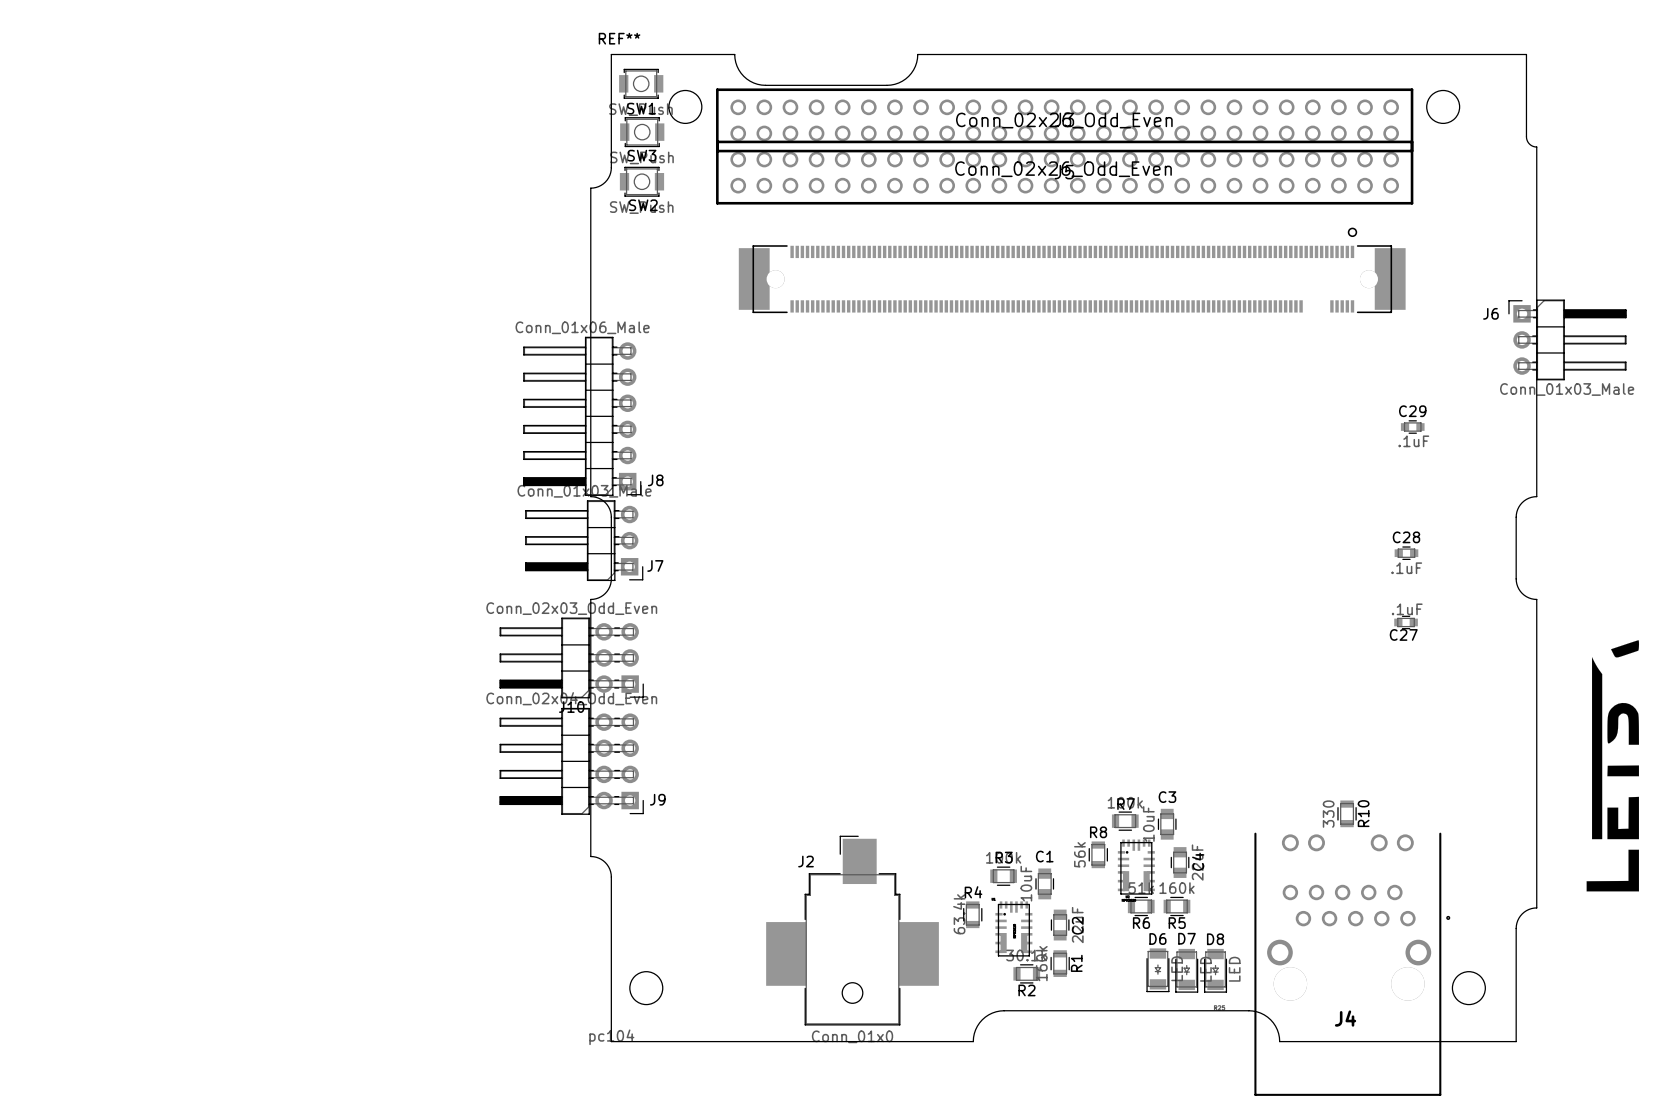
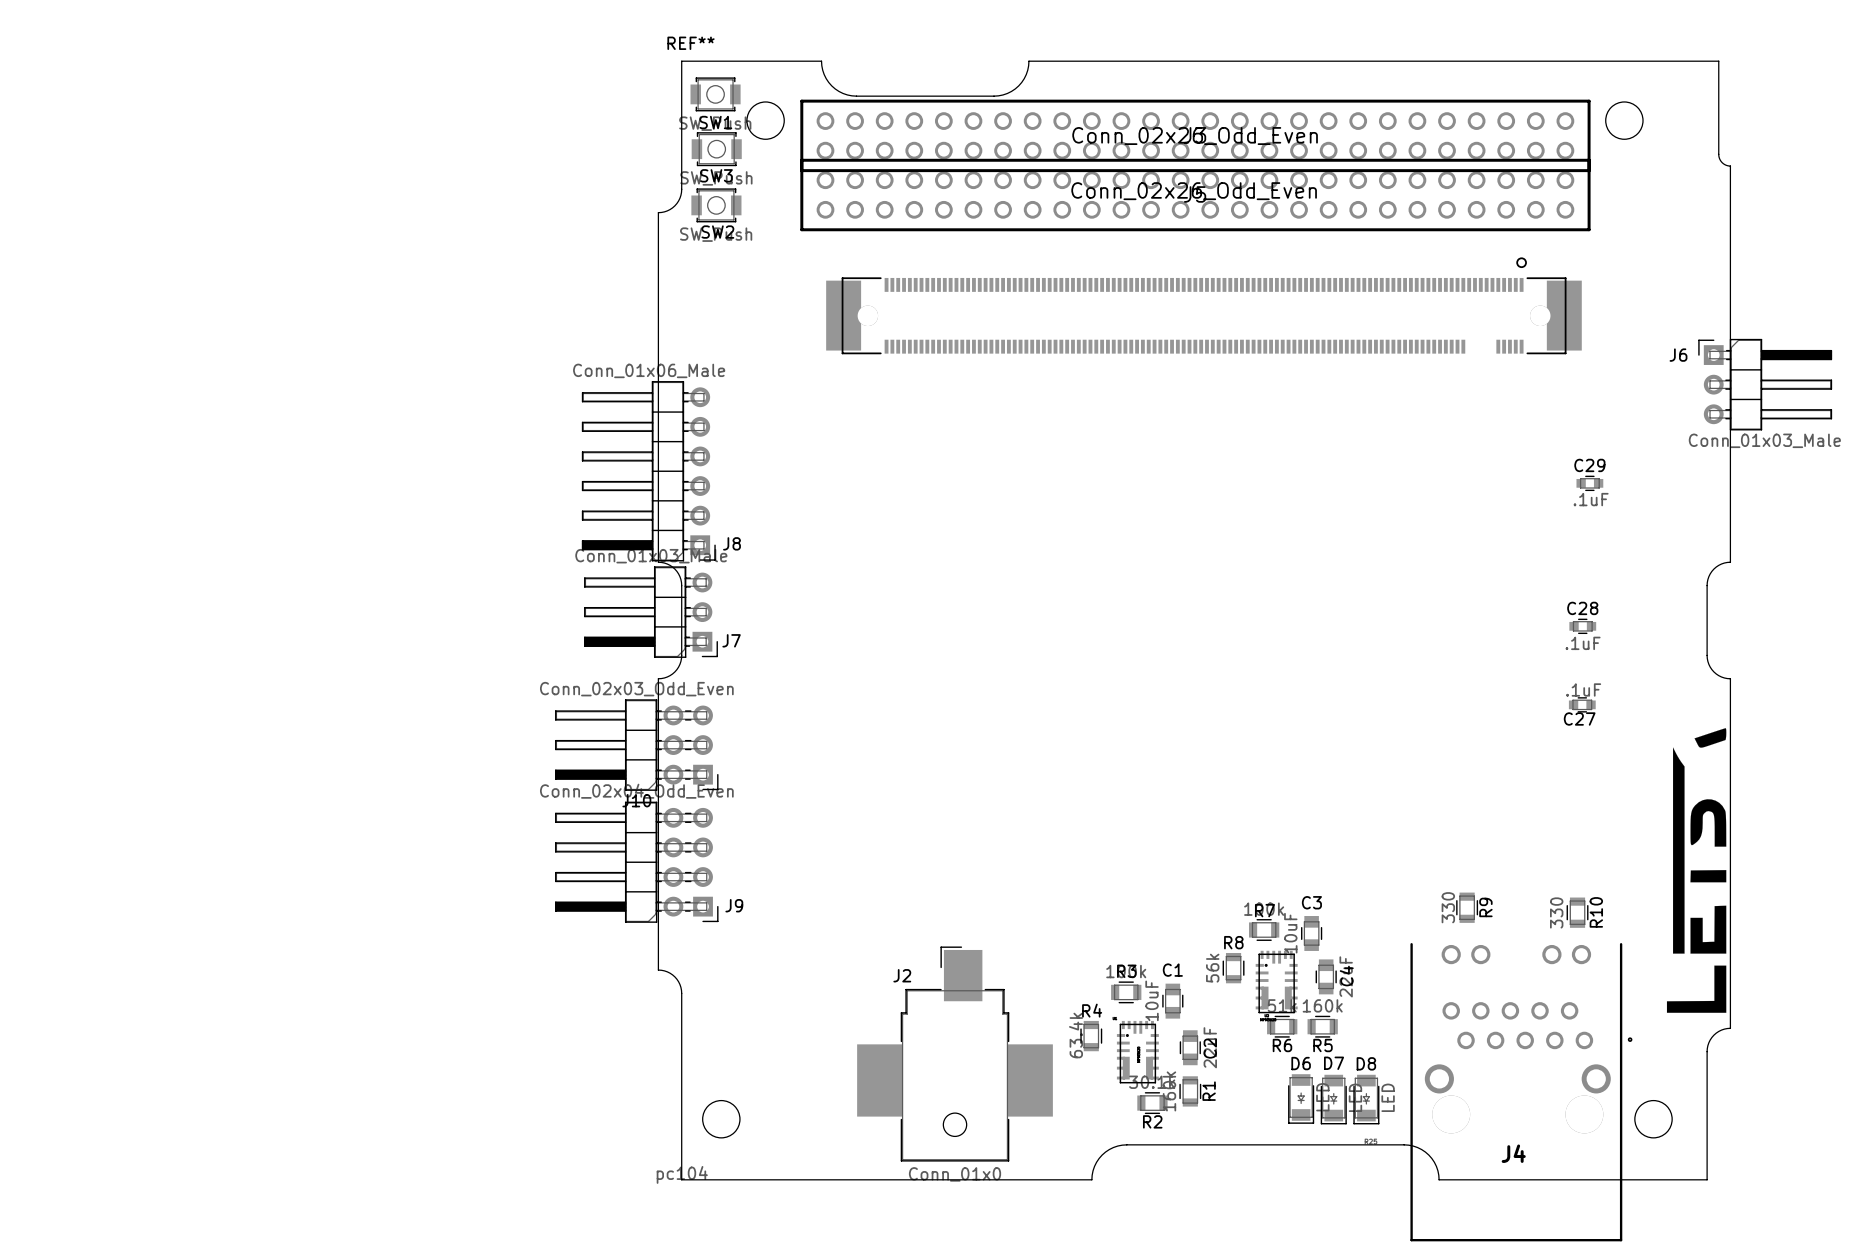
drawing position: (1612, 765) -> (1696, 870)
R9: none -> 330 (1467, 907)
R10 position: (1347, 813) -> (1577, 912)

